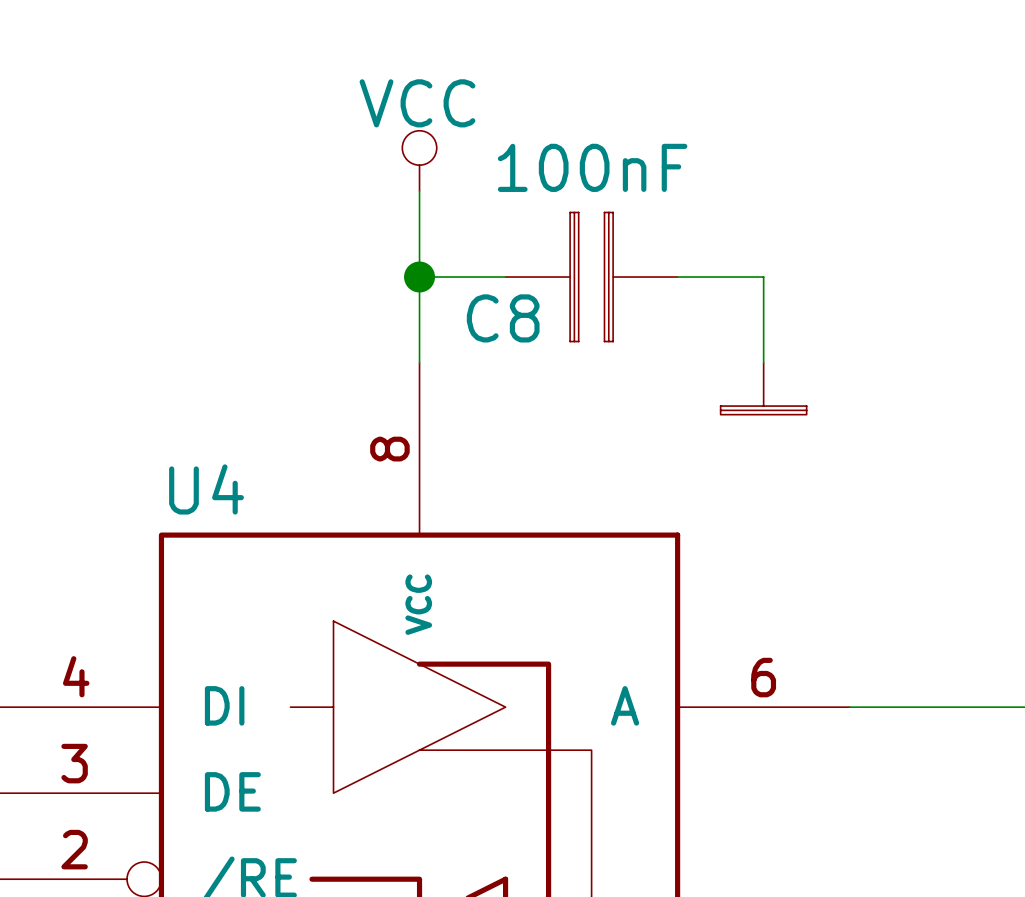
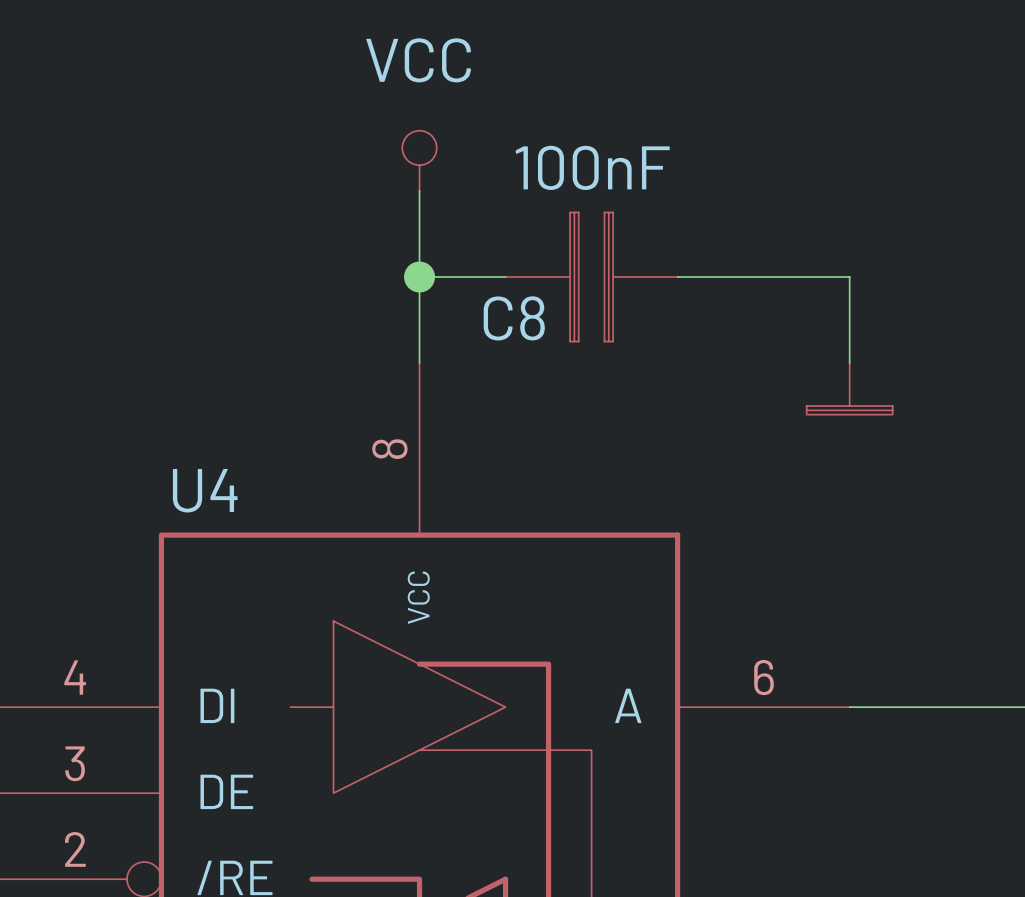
power symbol text position: VCC (417, 103) -> VCC (418, 60)
wire: (763, 277) (763, 363) -> (763, 277) (849, 277) (849, 363)
power symbol position: (763, 388) -> (849, 388)

